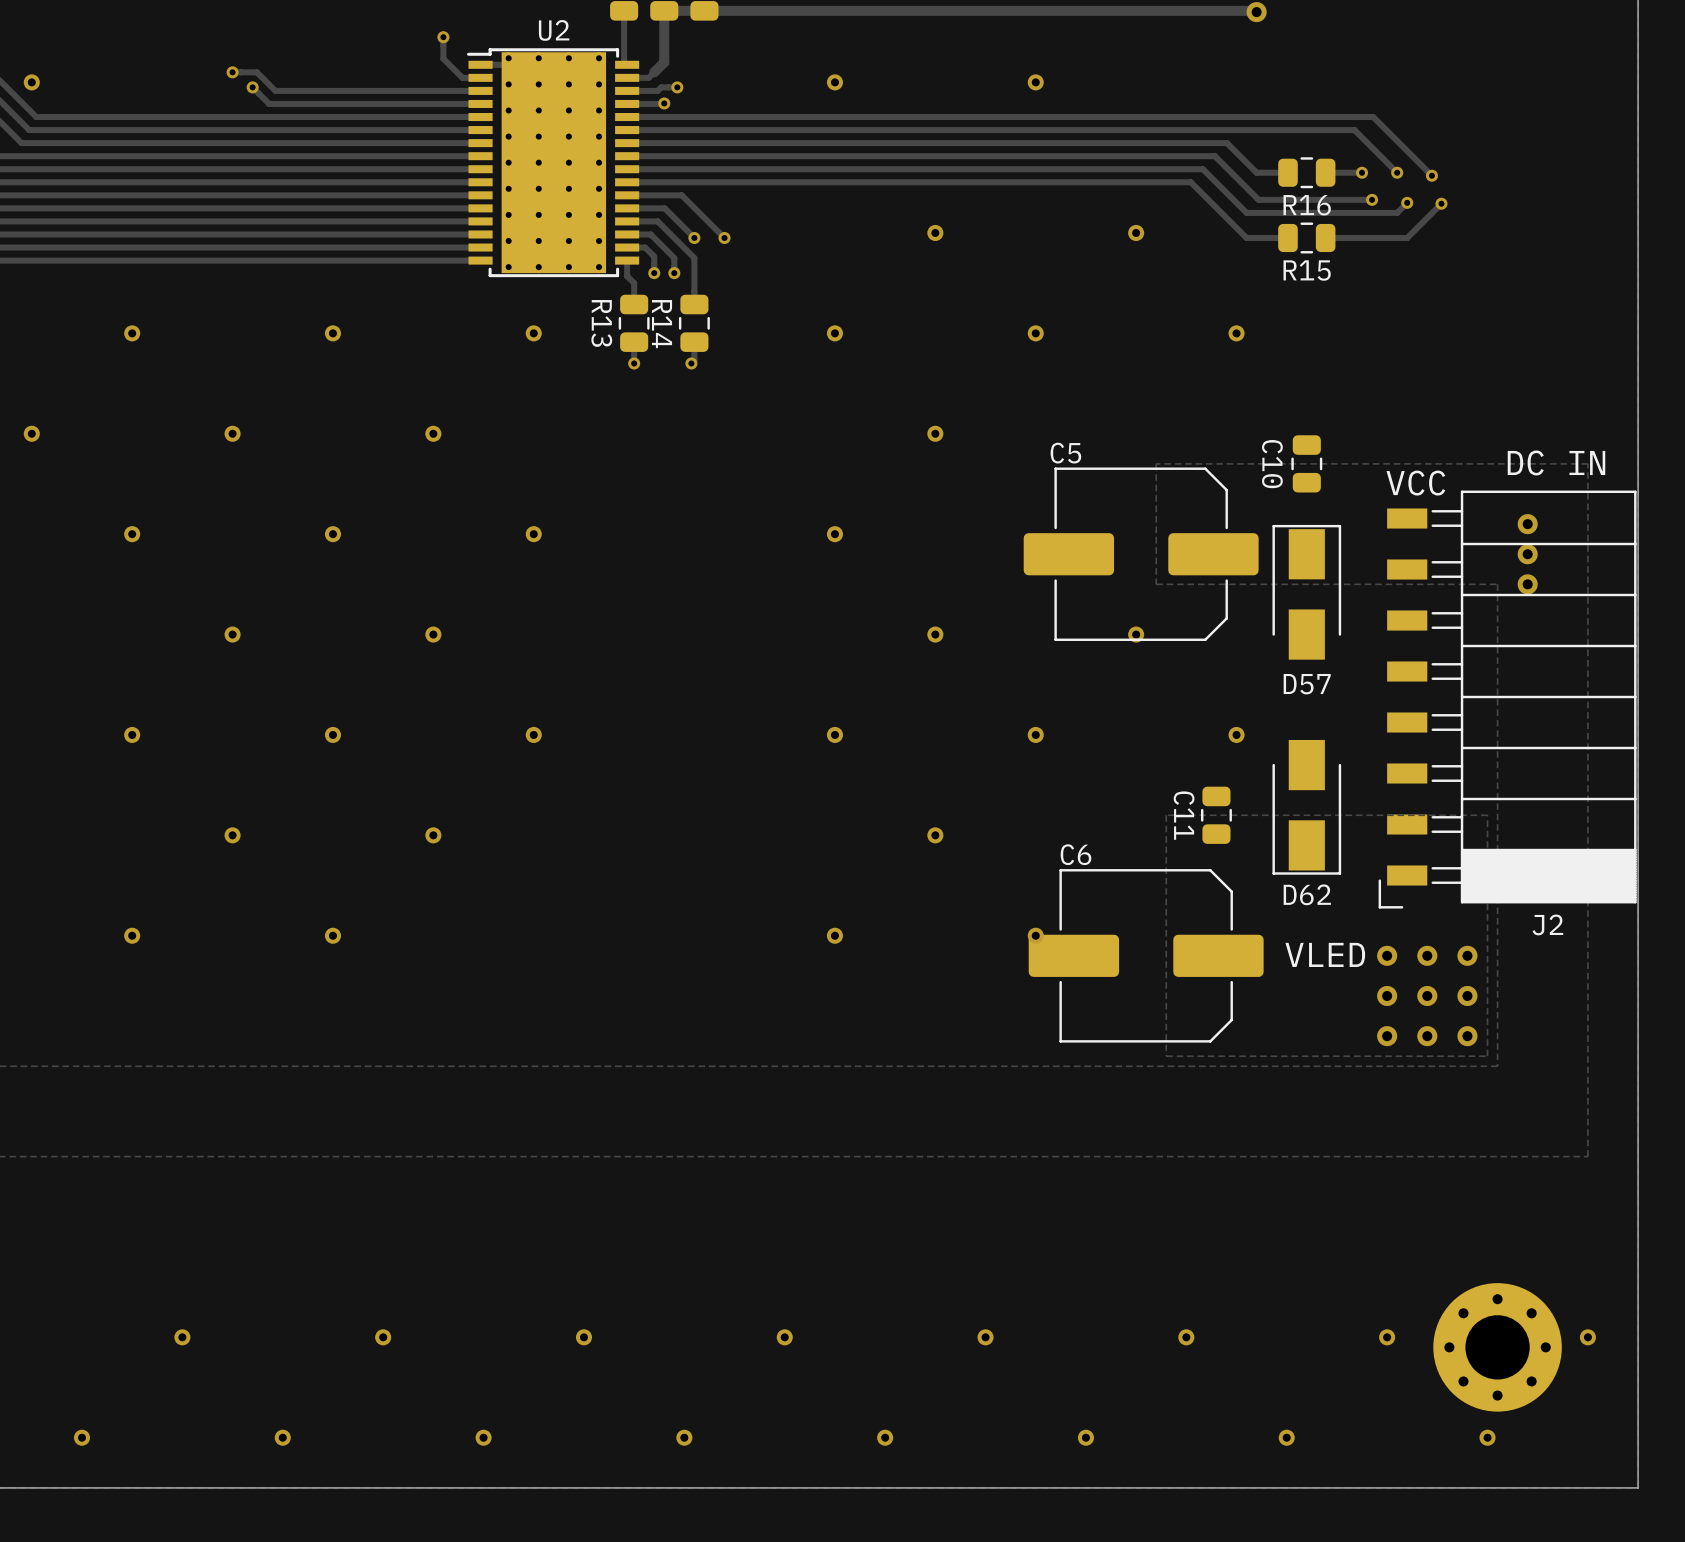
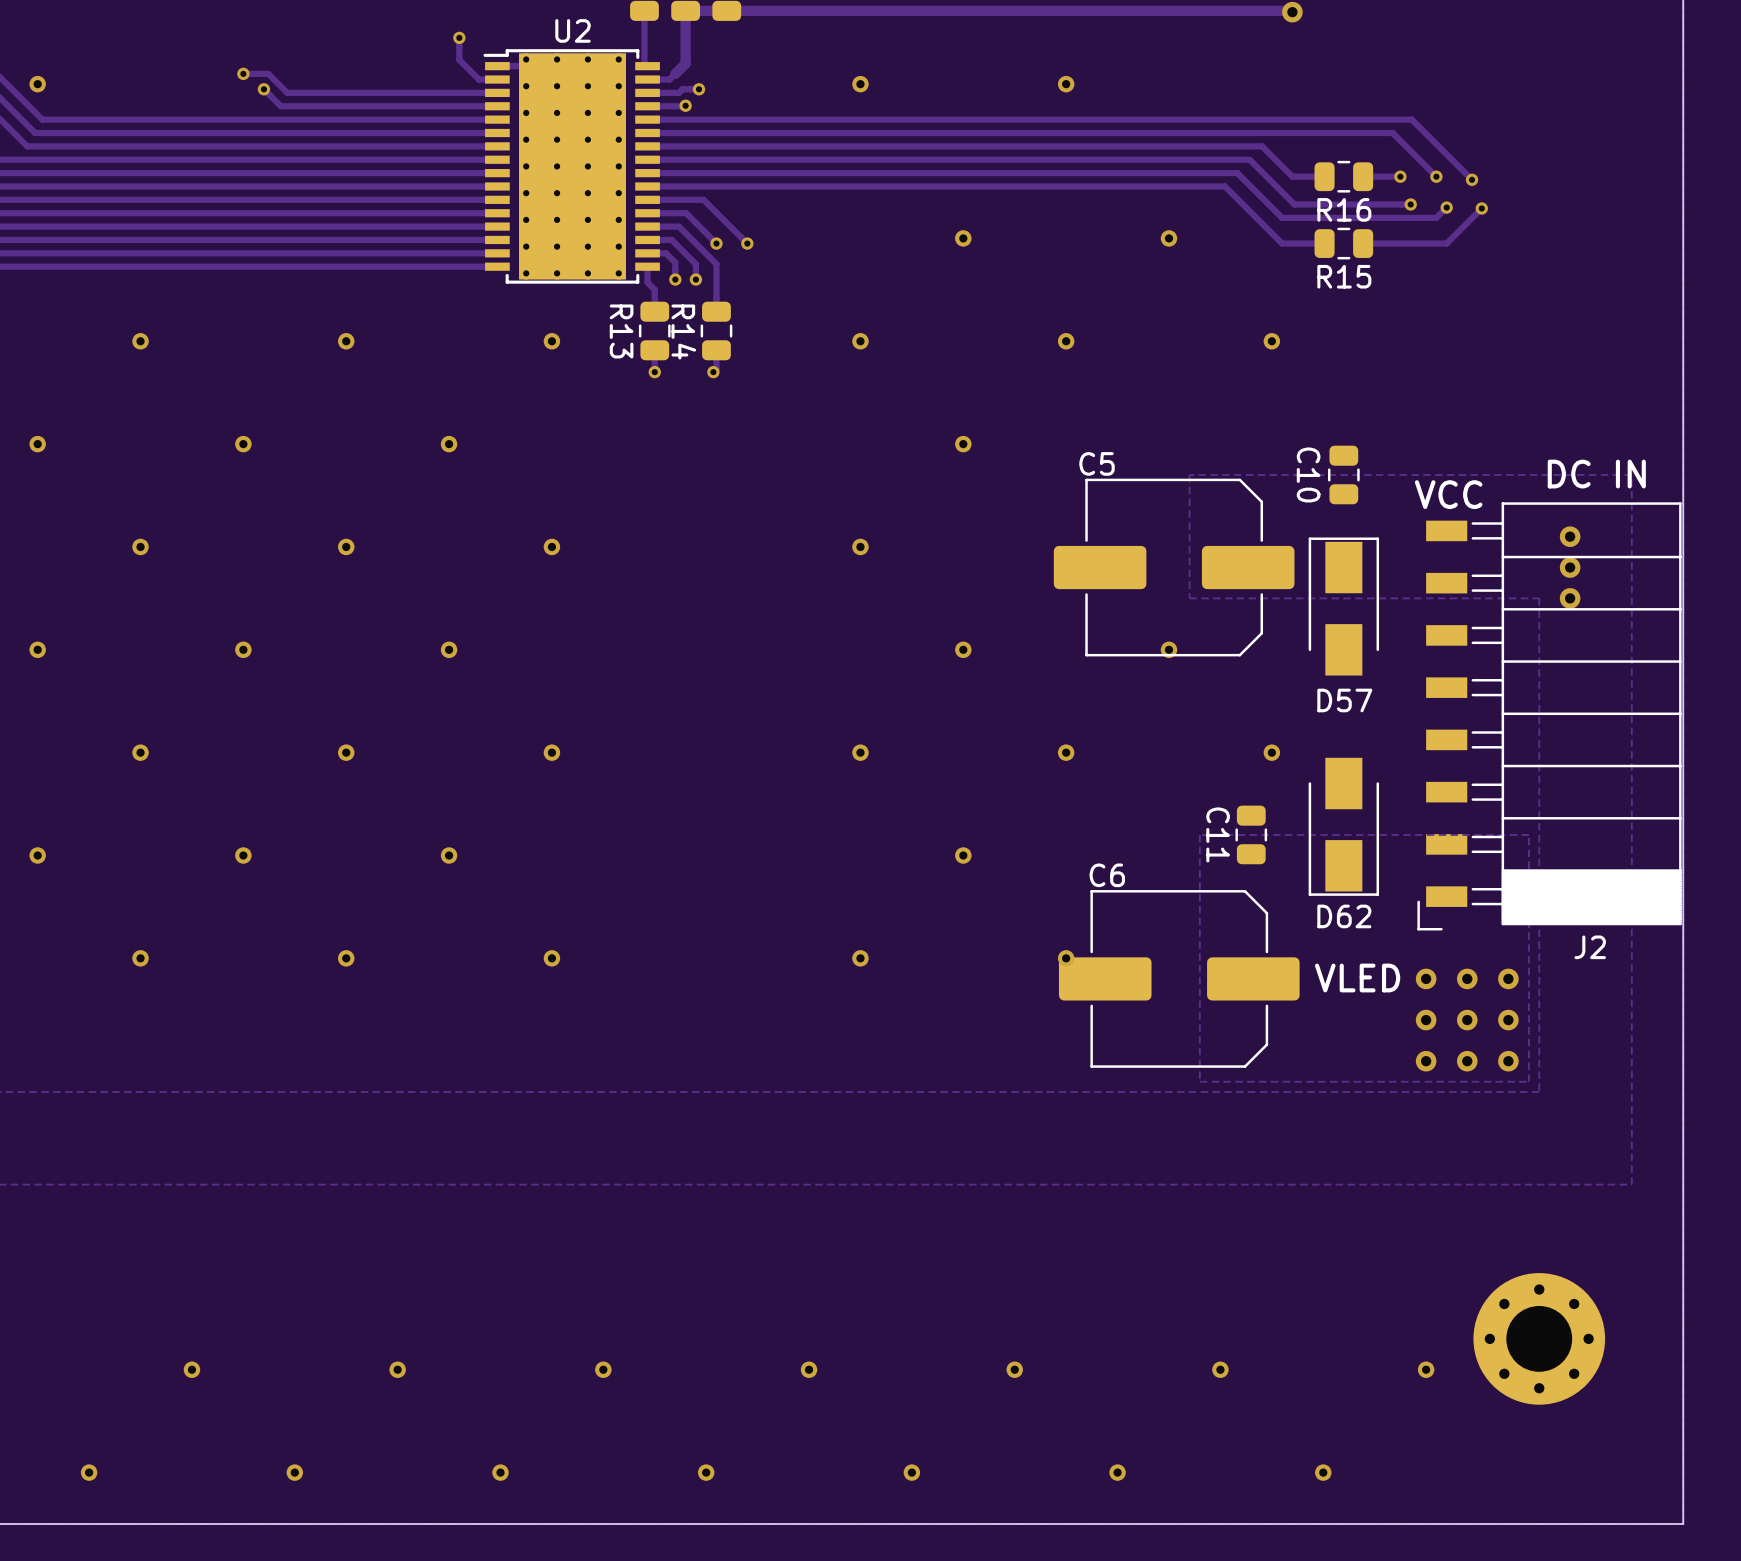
via: none -> (37, 649)
via: none -> (37, 855)
via: none -> (551, 958)
via: (1587, 1337) -> none
part position: (1497, 1347) -> (1539, 1338)
via: (1487, 1437) -> none

